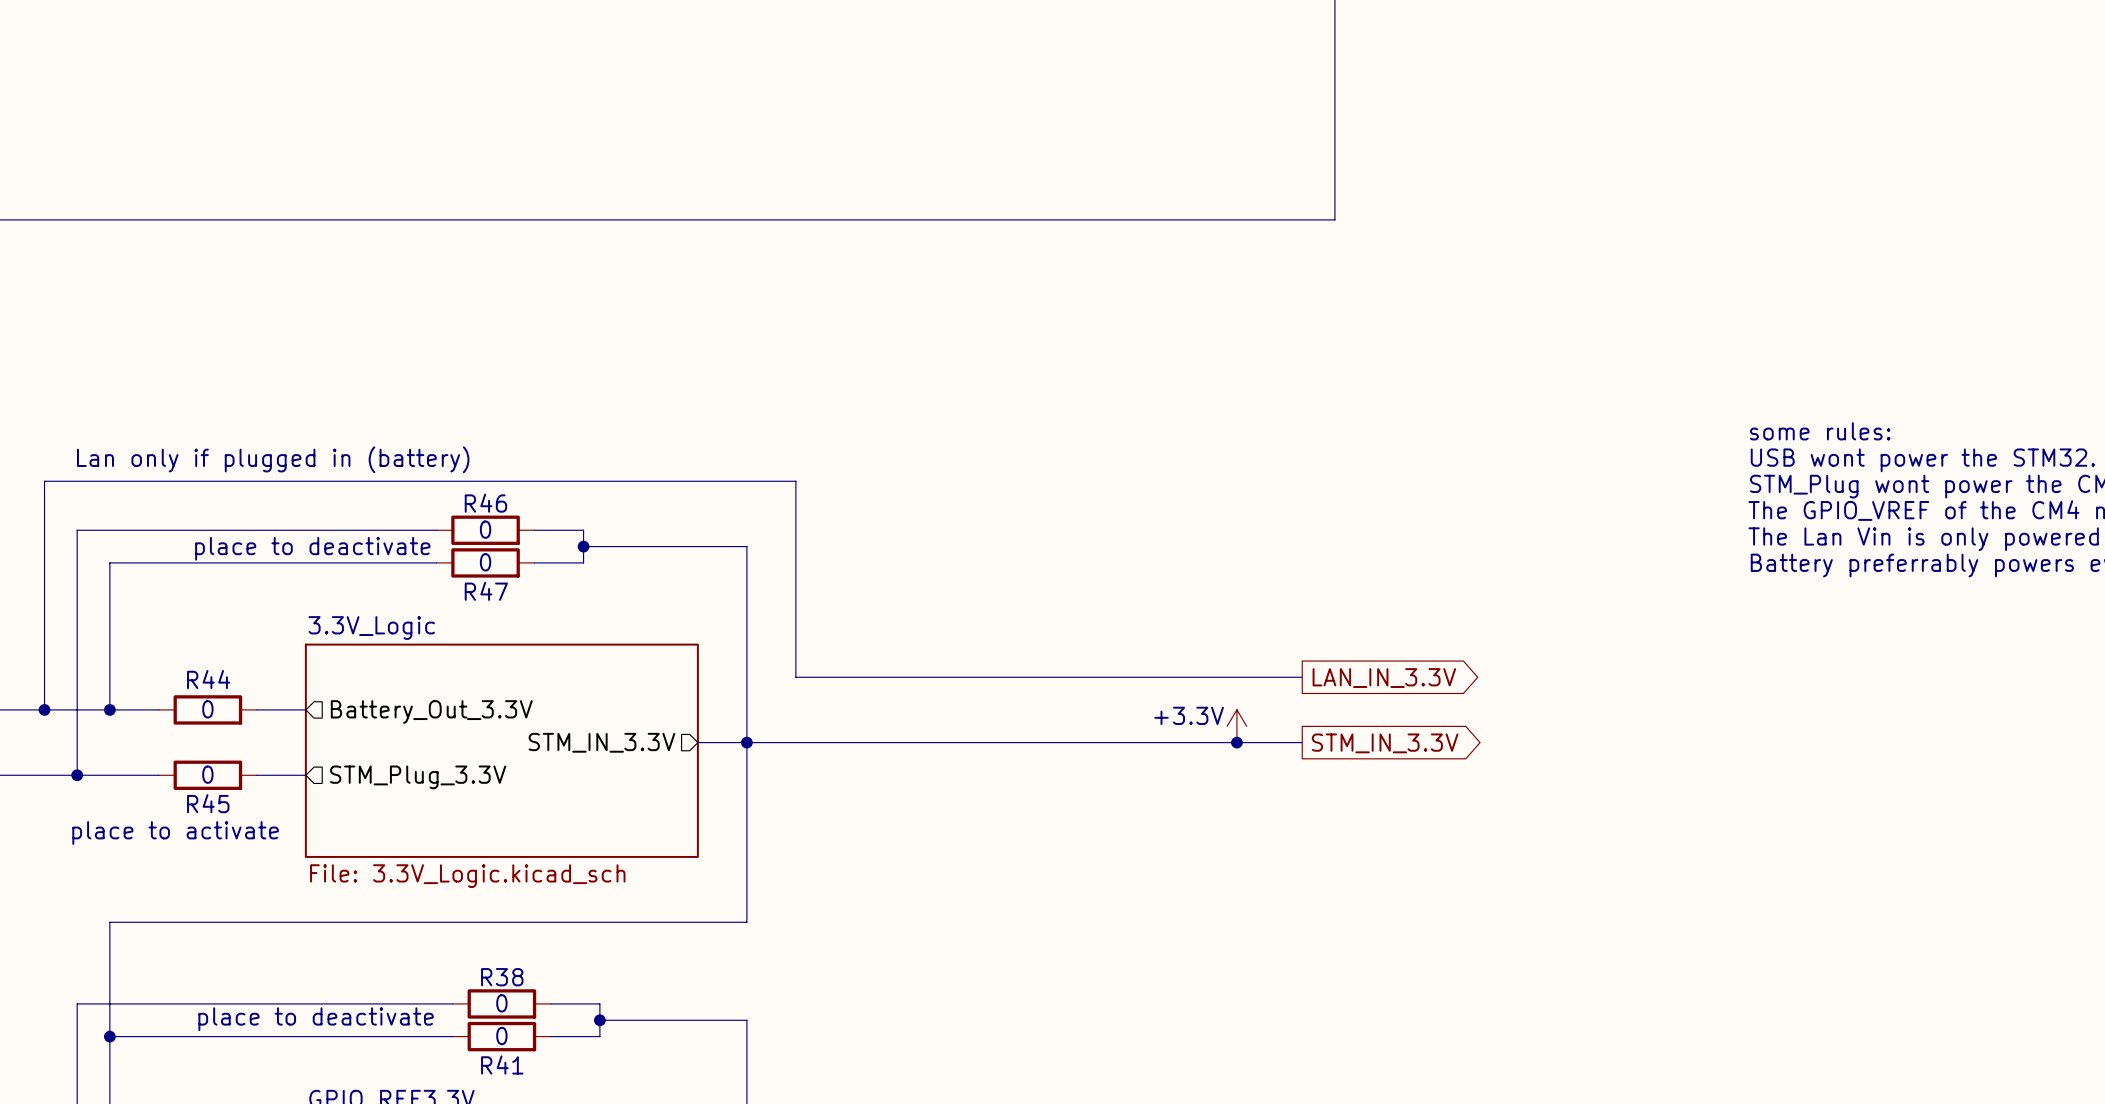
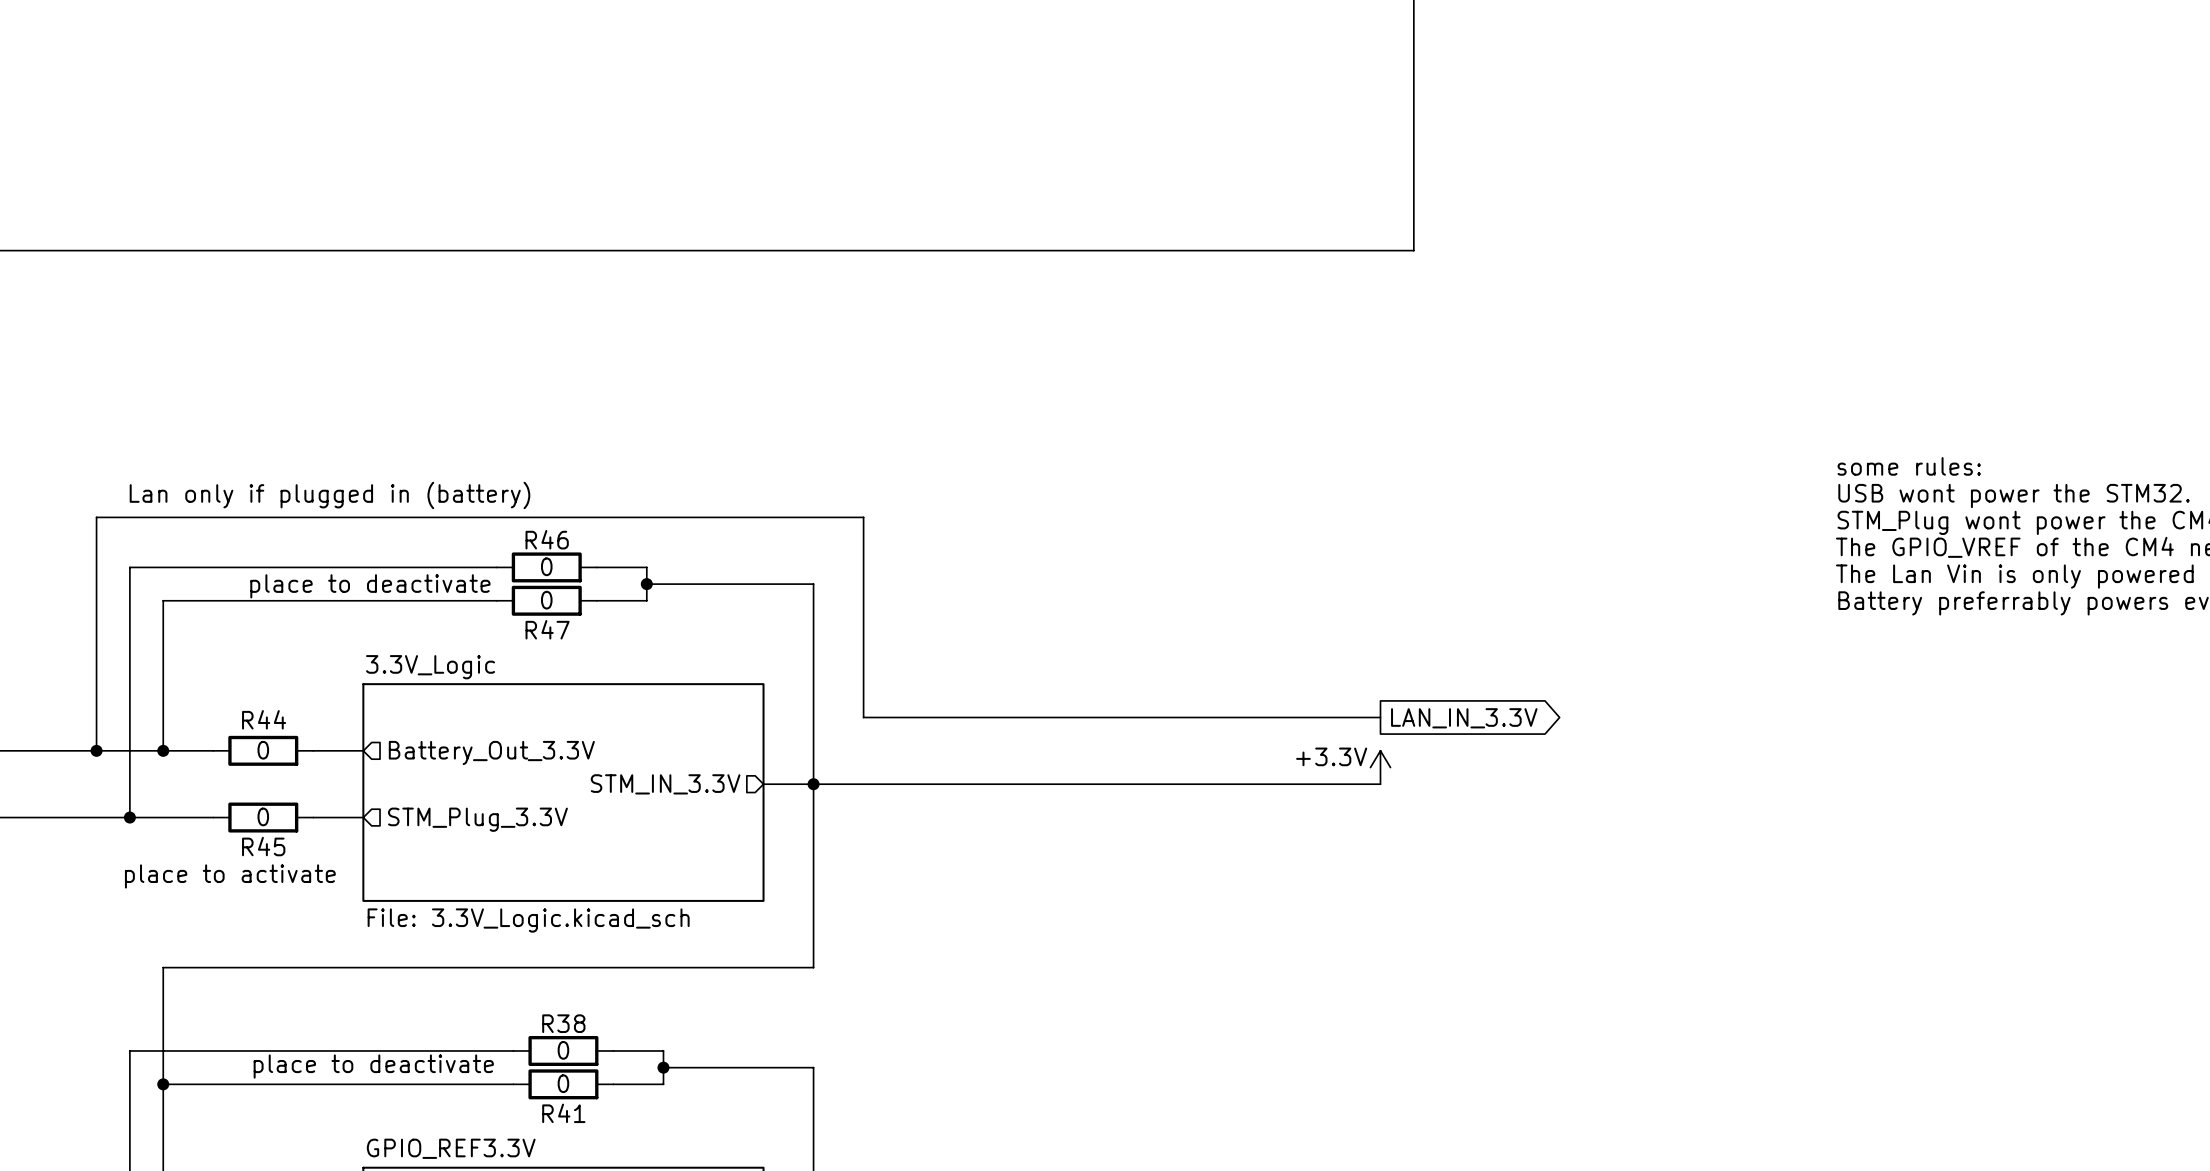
power symbol position: +3.3V (1236, 726) -> +3.3V (1380, 767)
junction: (1236, 742) -> none
global label: STM_IN_3.3V (1385, 743) -> none

